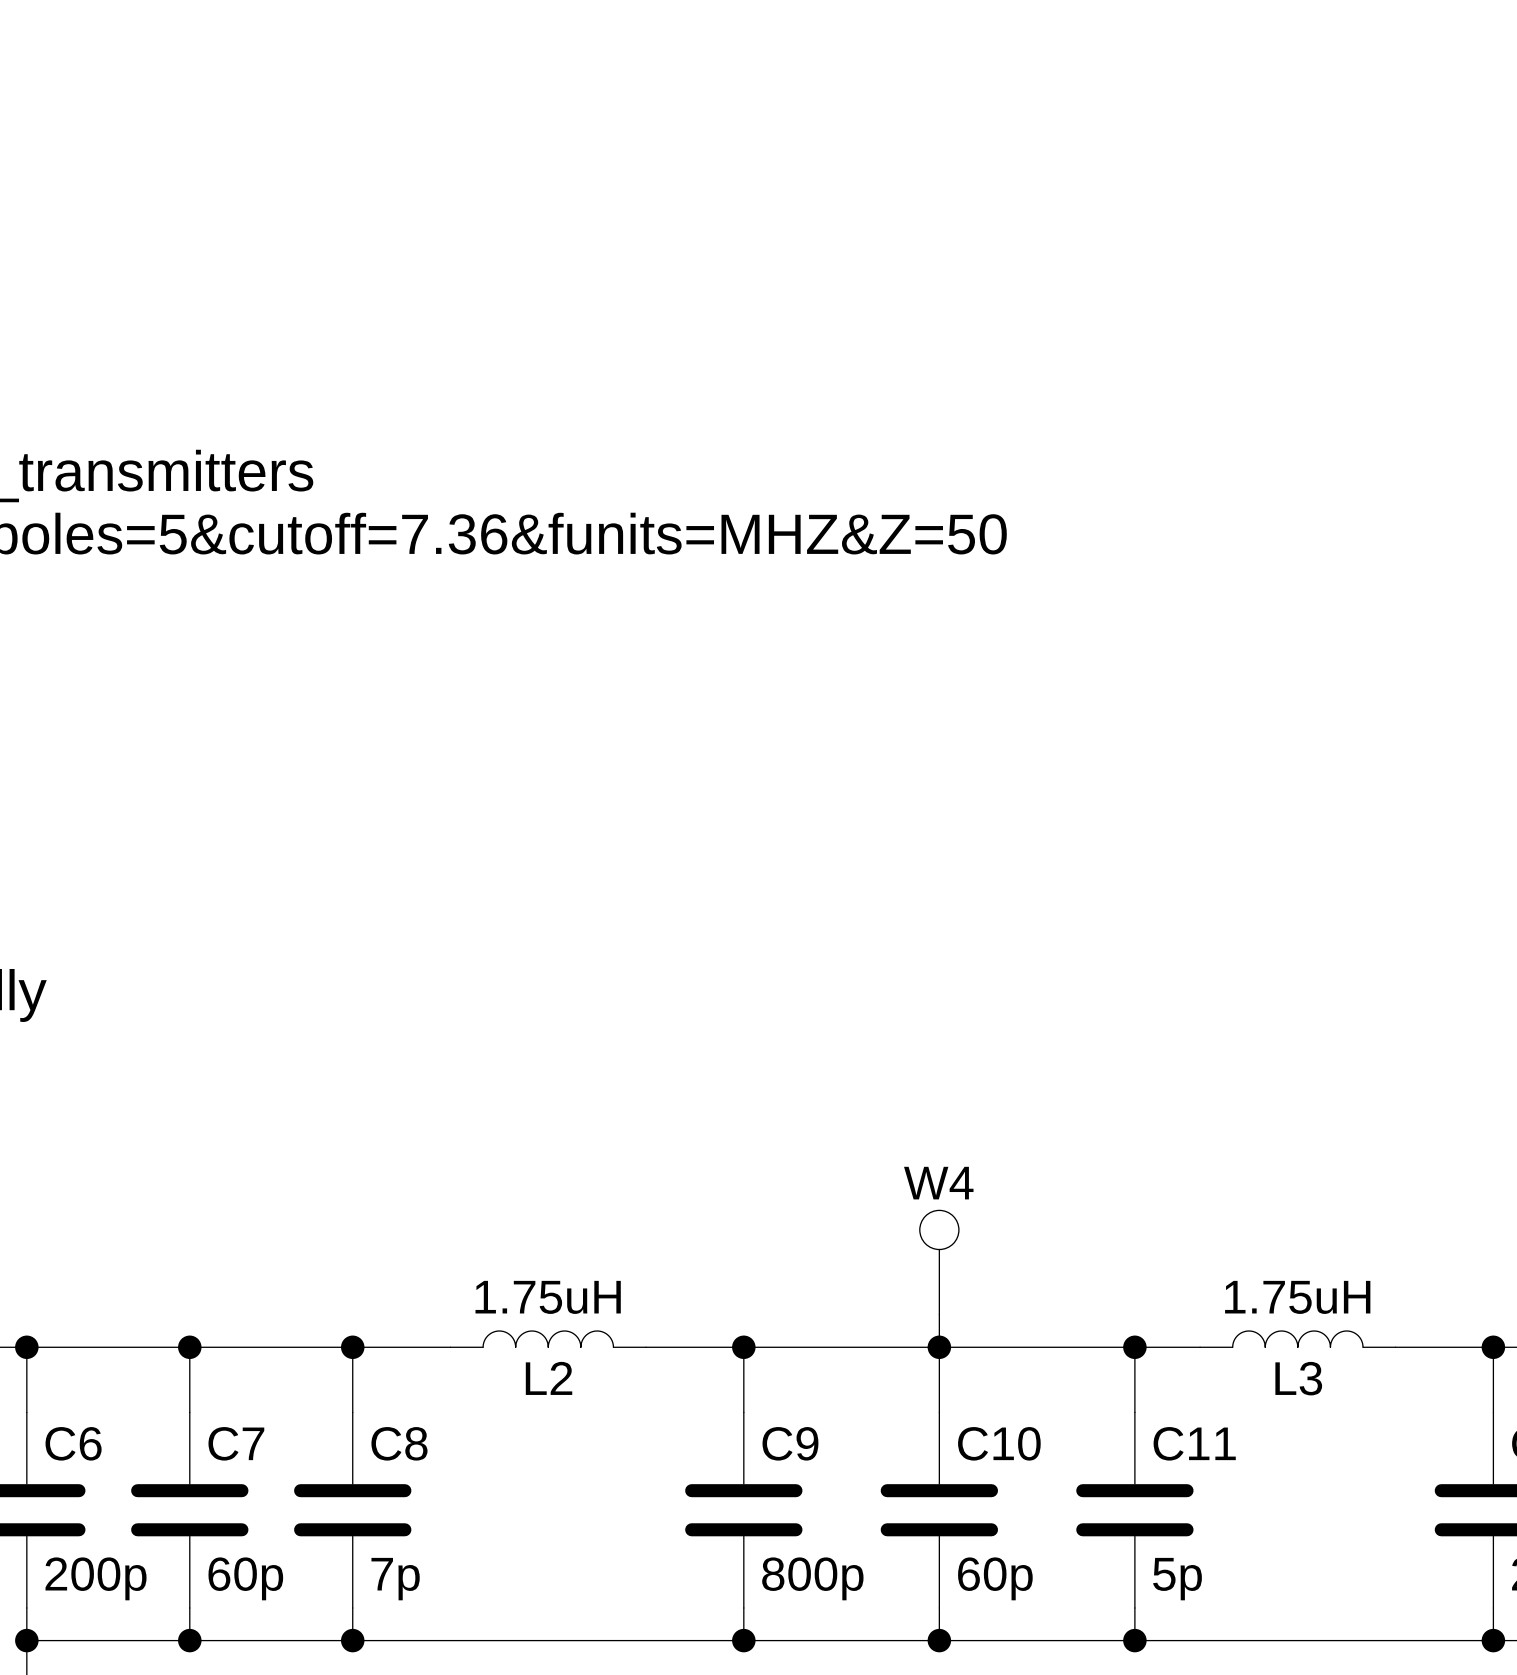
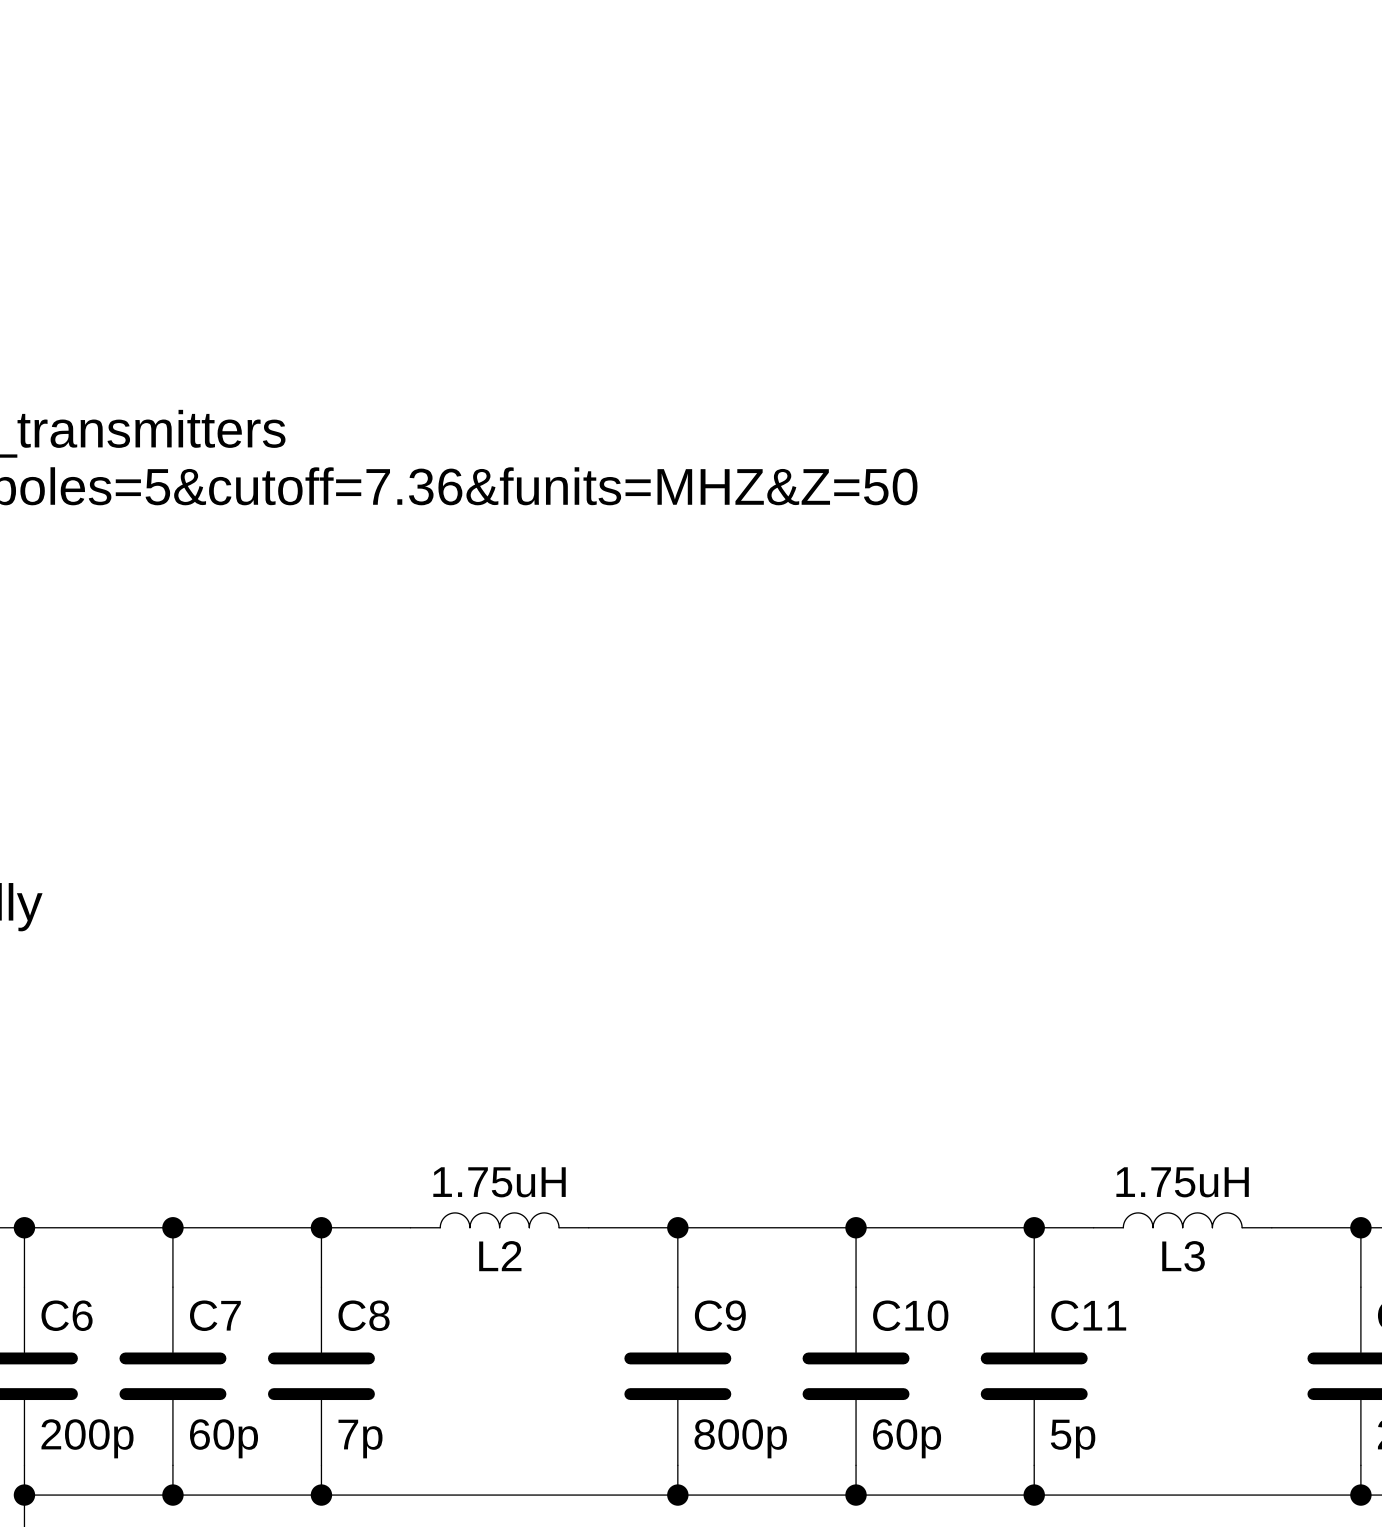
W4: (939, 1262) -> none
wire: (939, 1314) (939, 1347) -> none

